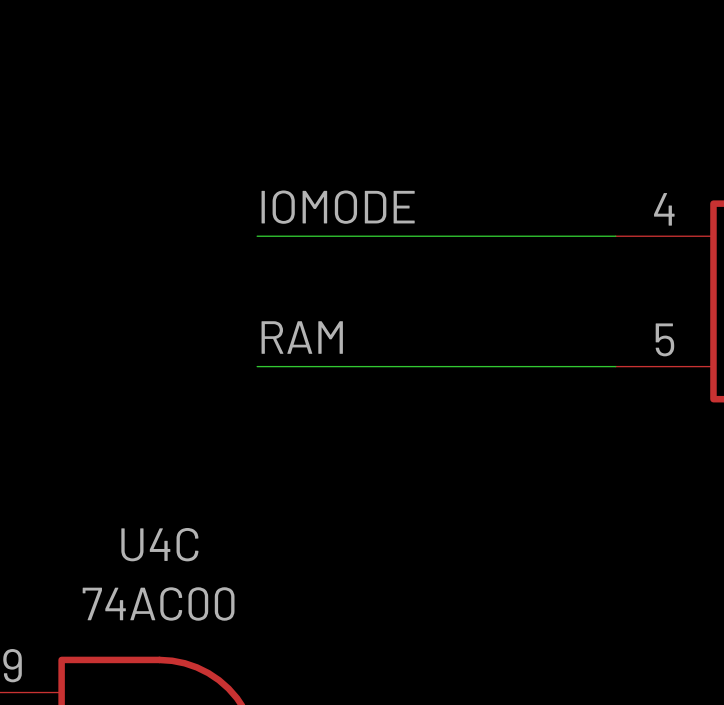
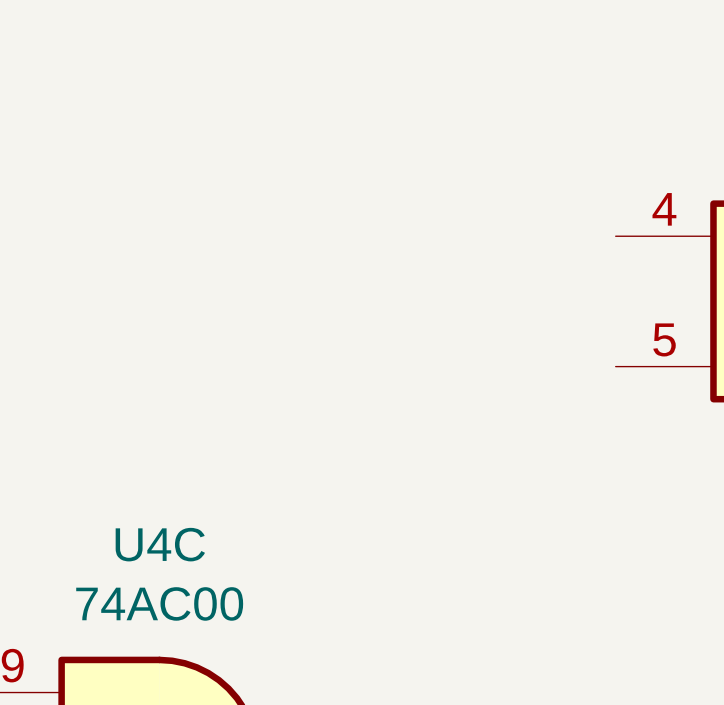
label: IOMODE (338, 207) -> none
wire: (257, 236) (615, 236) -> none
label: RAM (302, 337) -> none
wire: (257, 366) (615, 366) -> none

